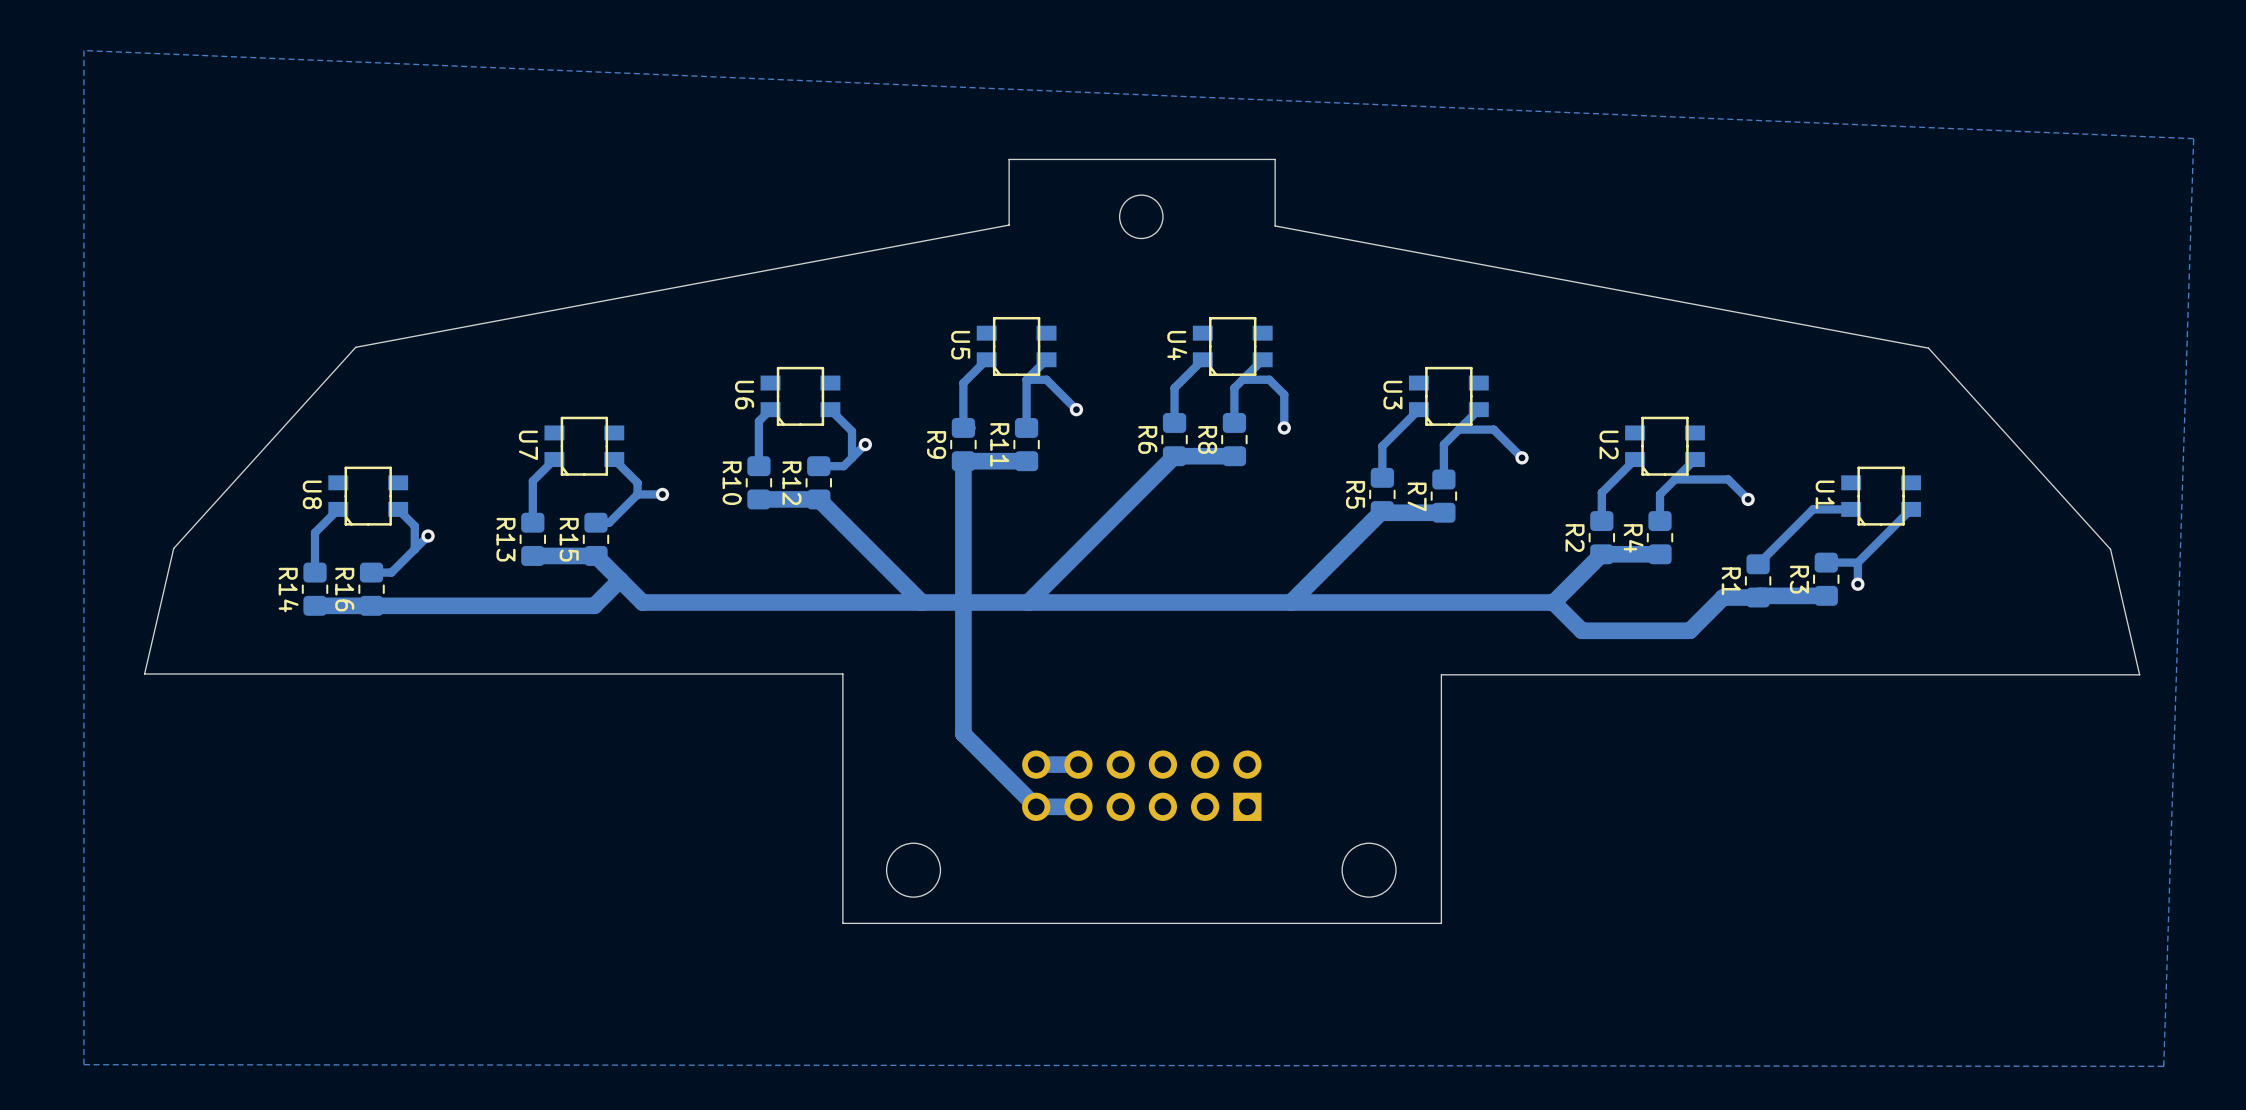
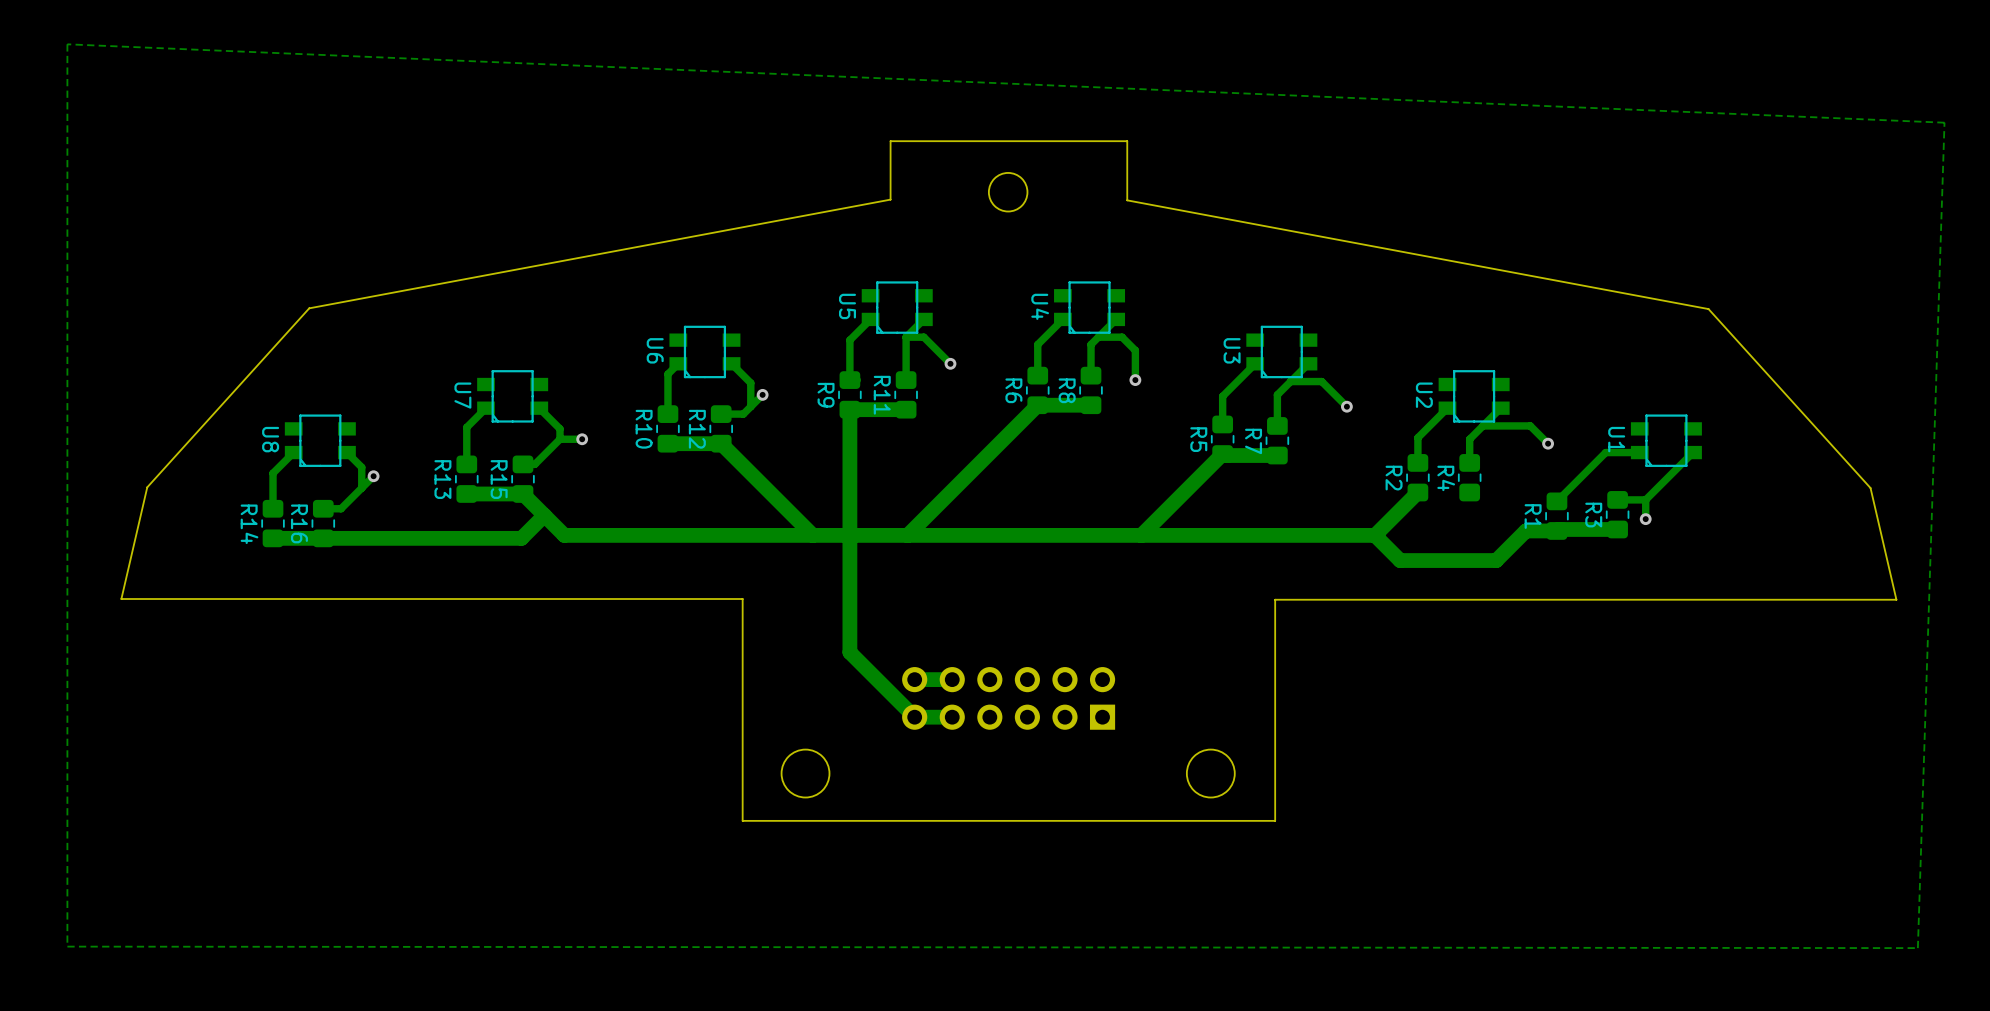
track: (1660, 554) (1601, 554) -> none

